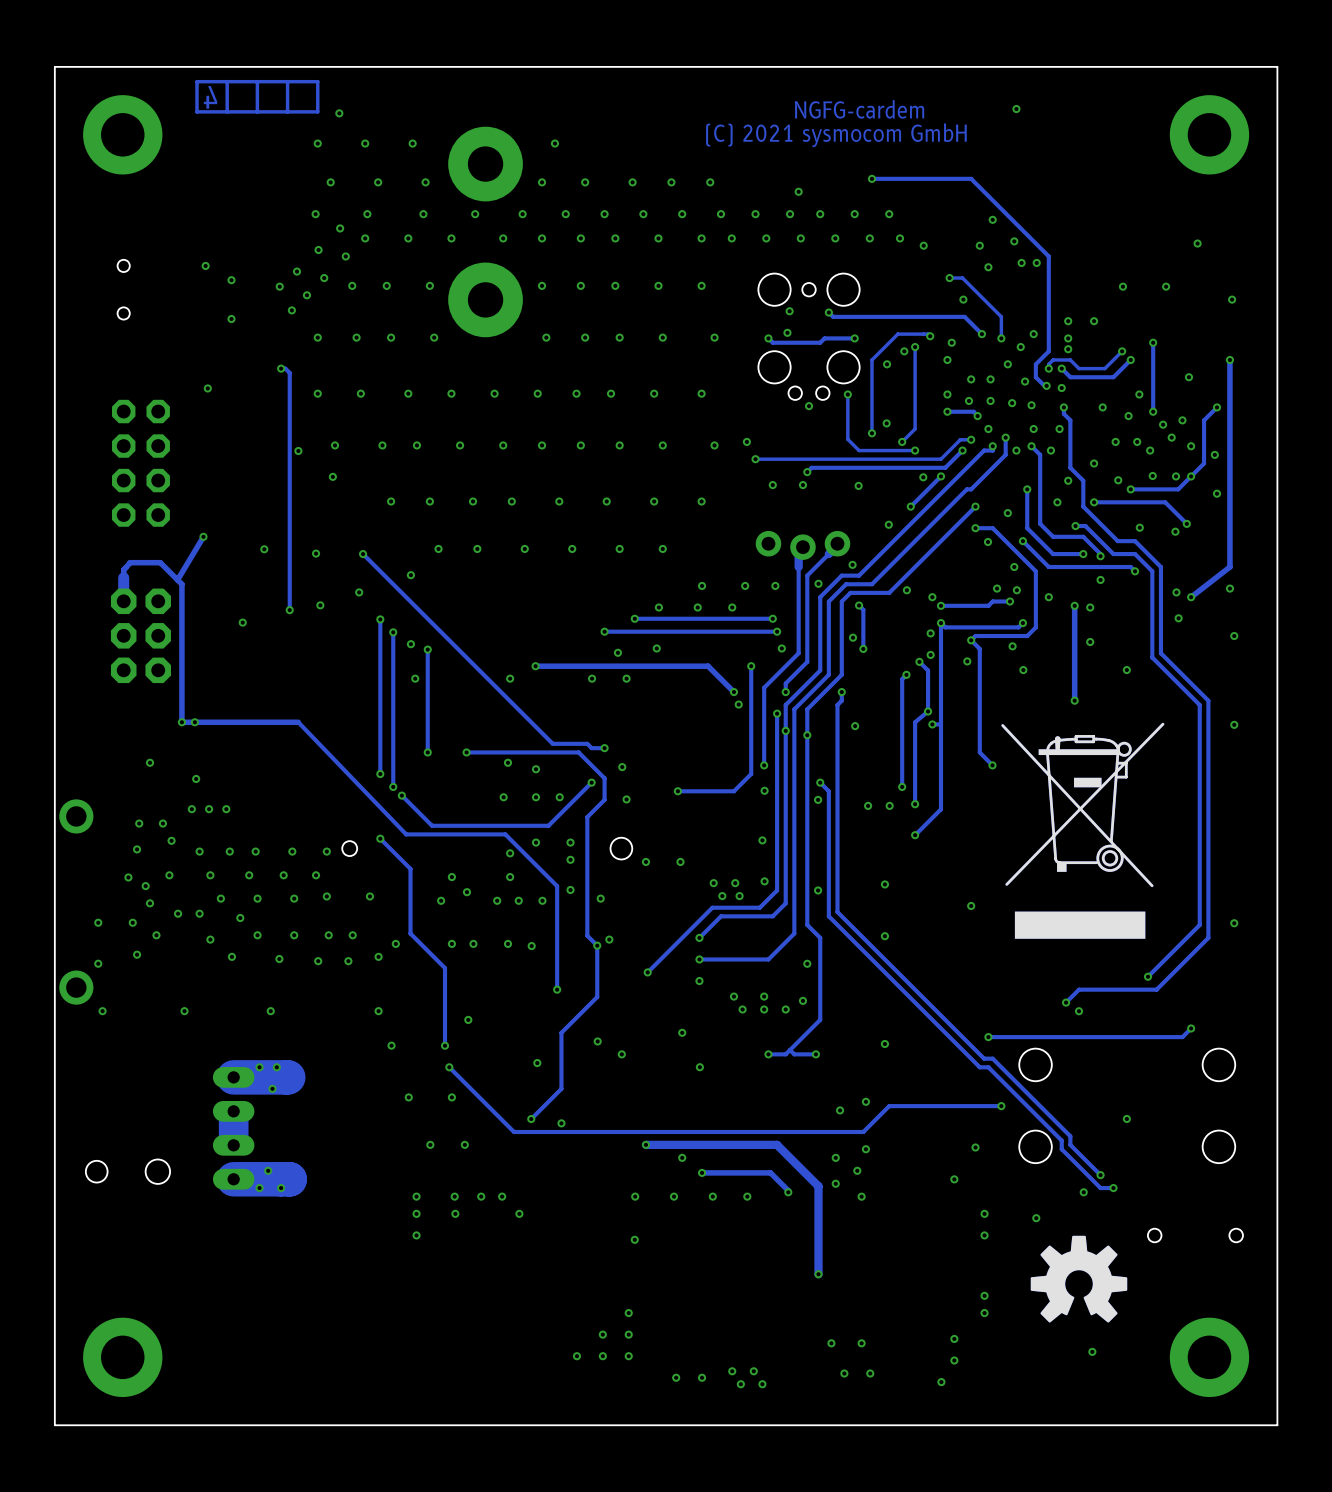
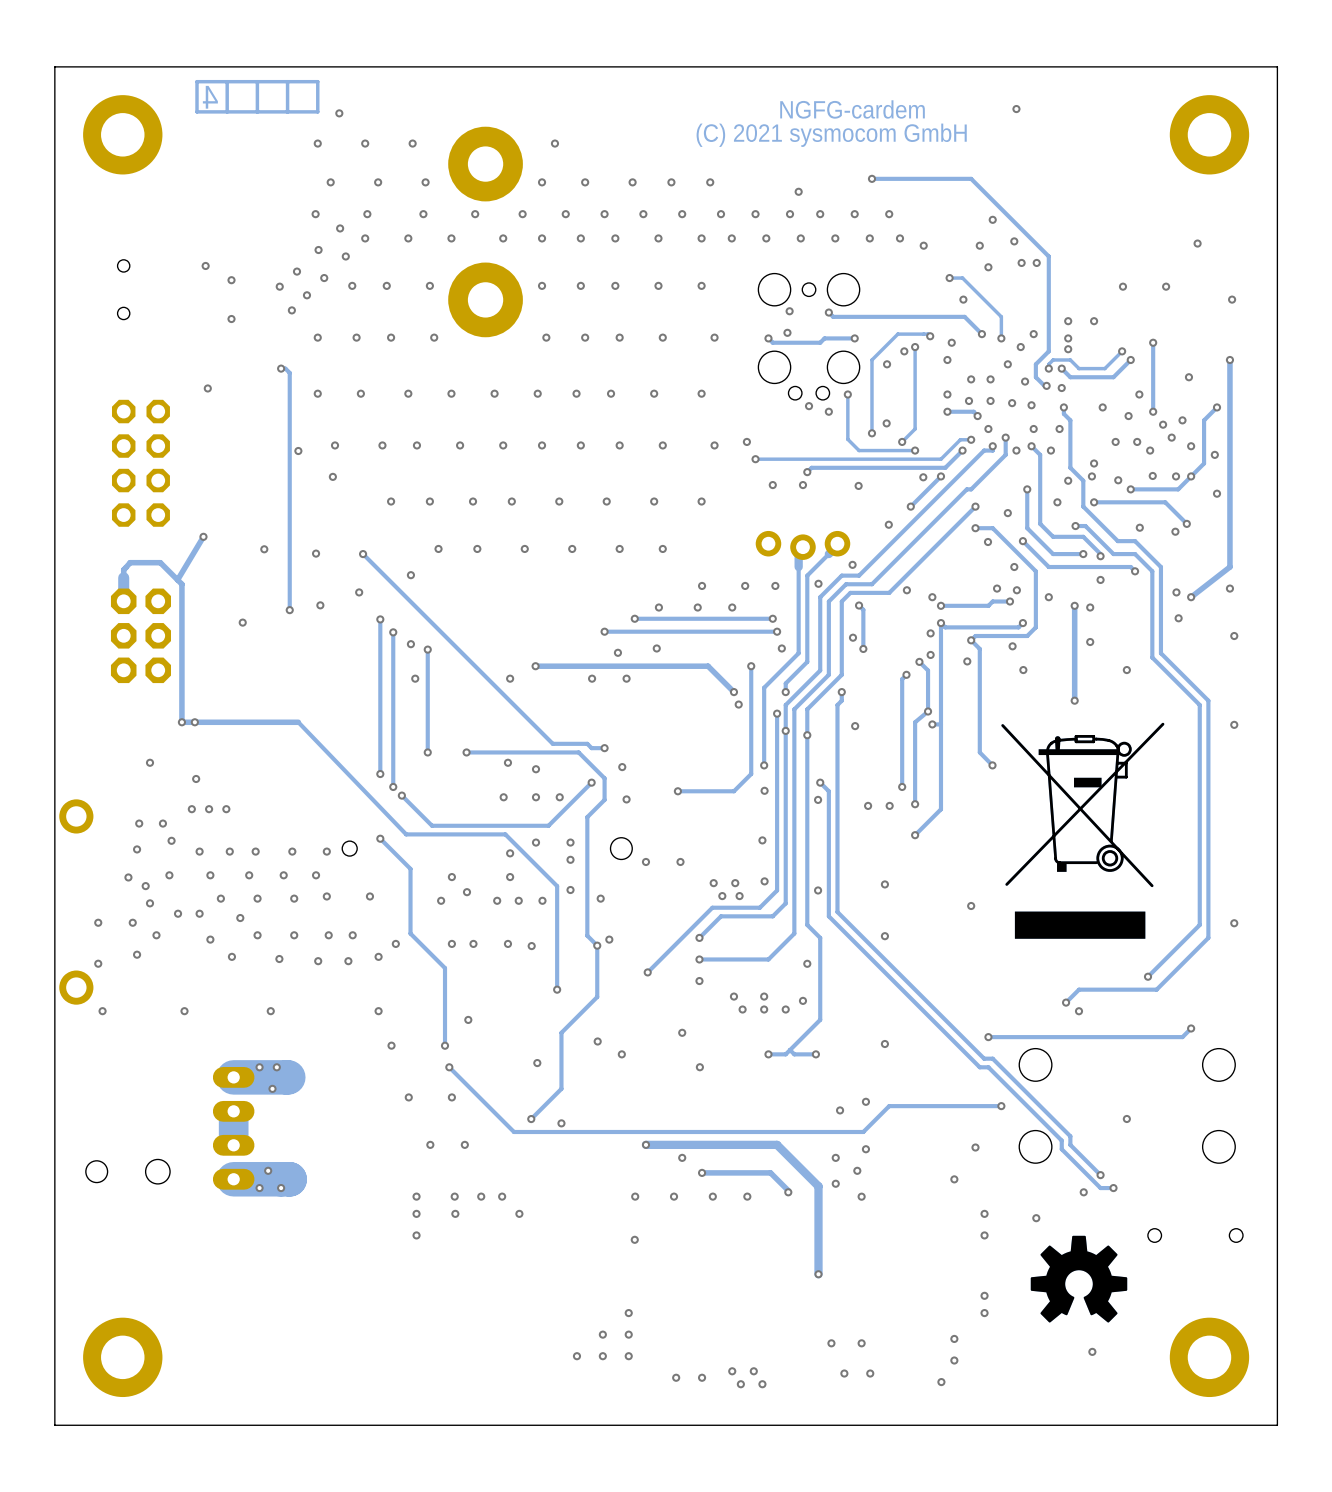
via: none -> (828, 411)
via: none -> (1091, 476)

